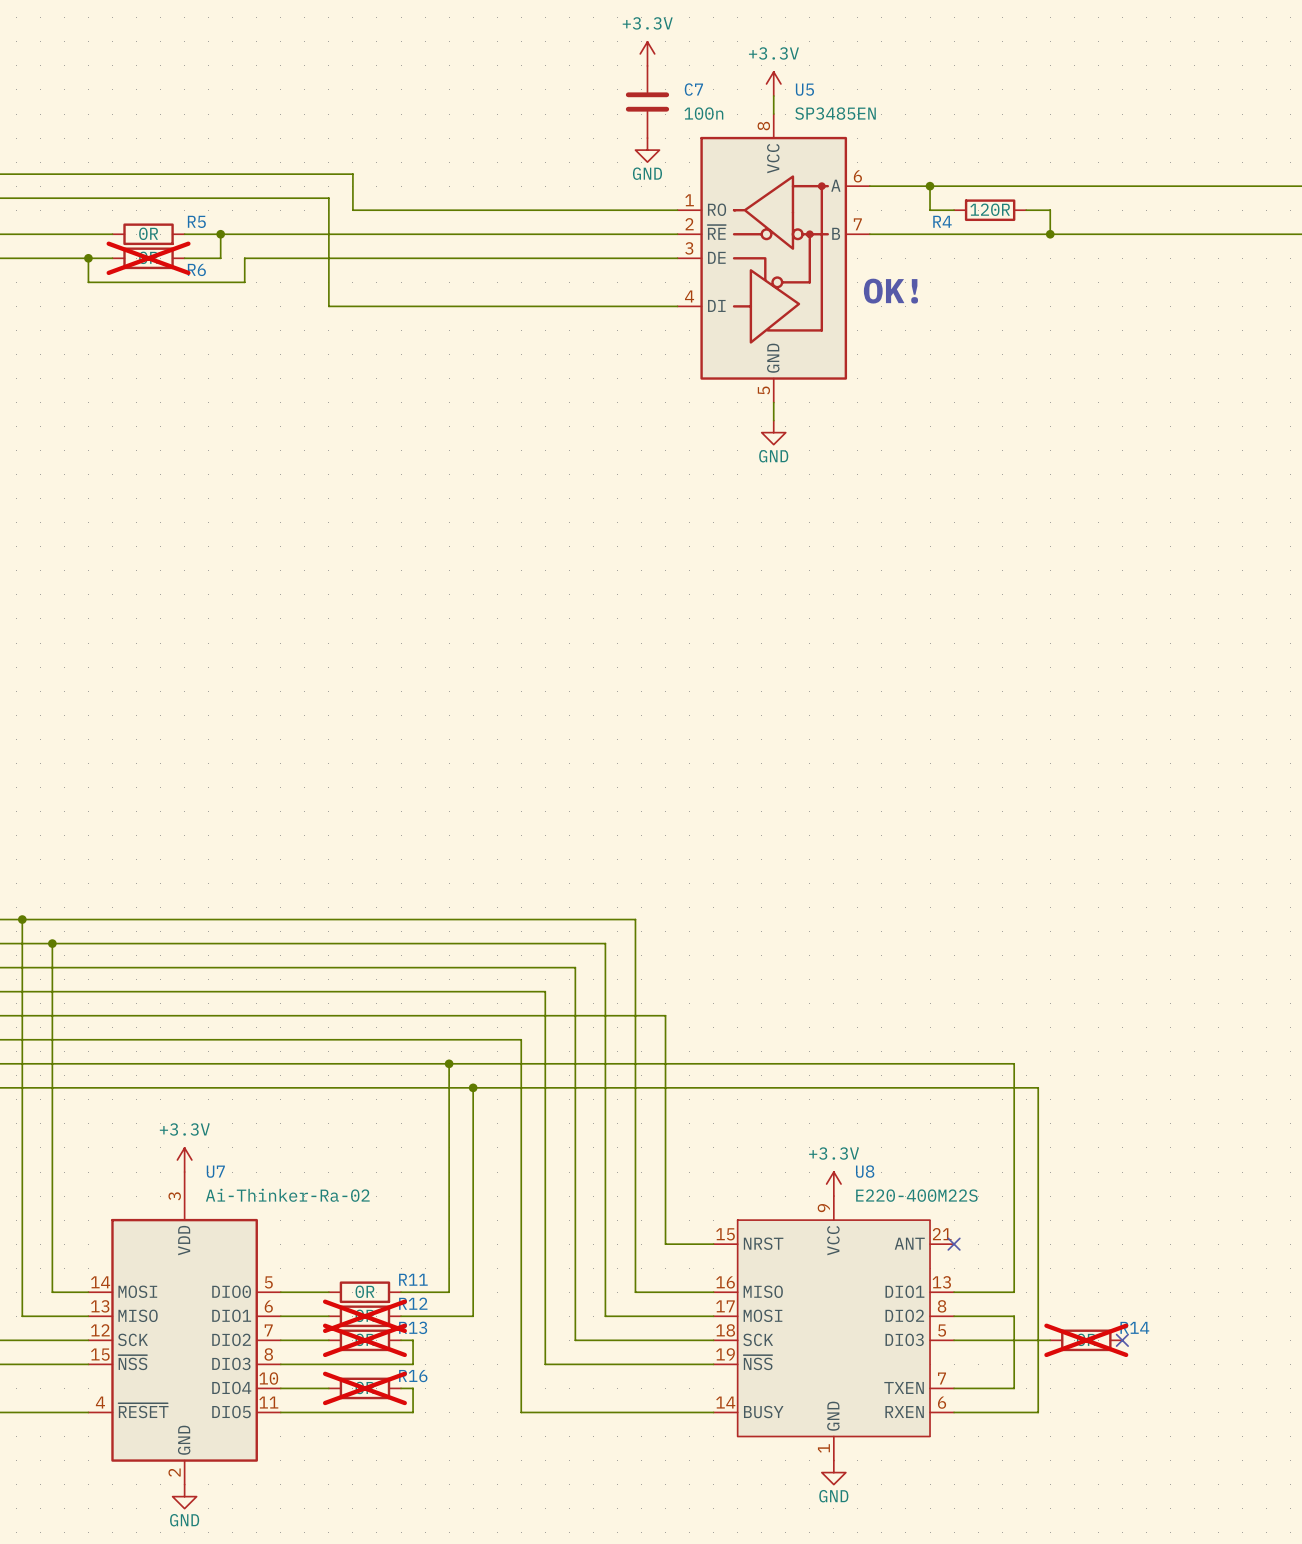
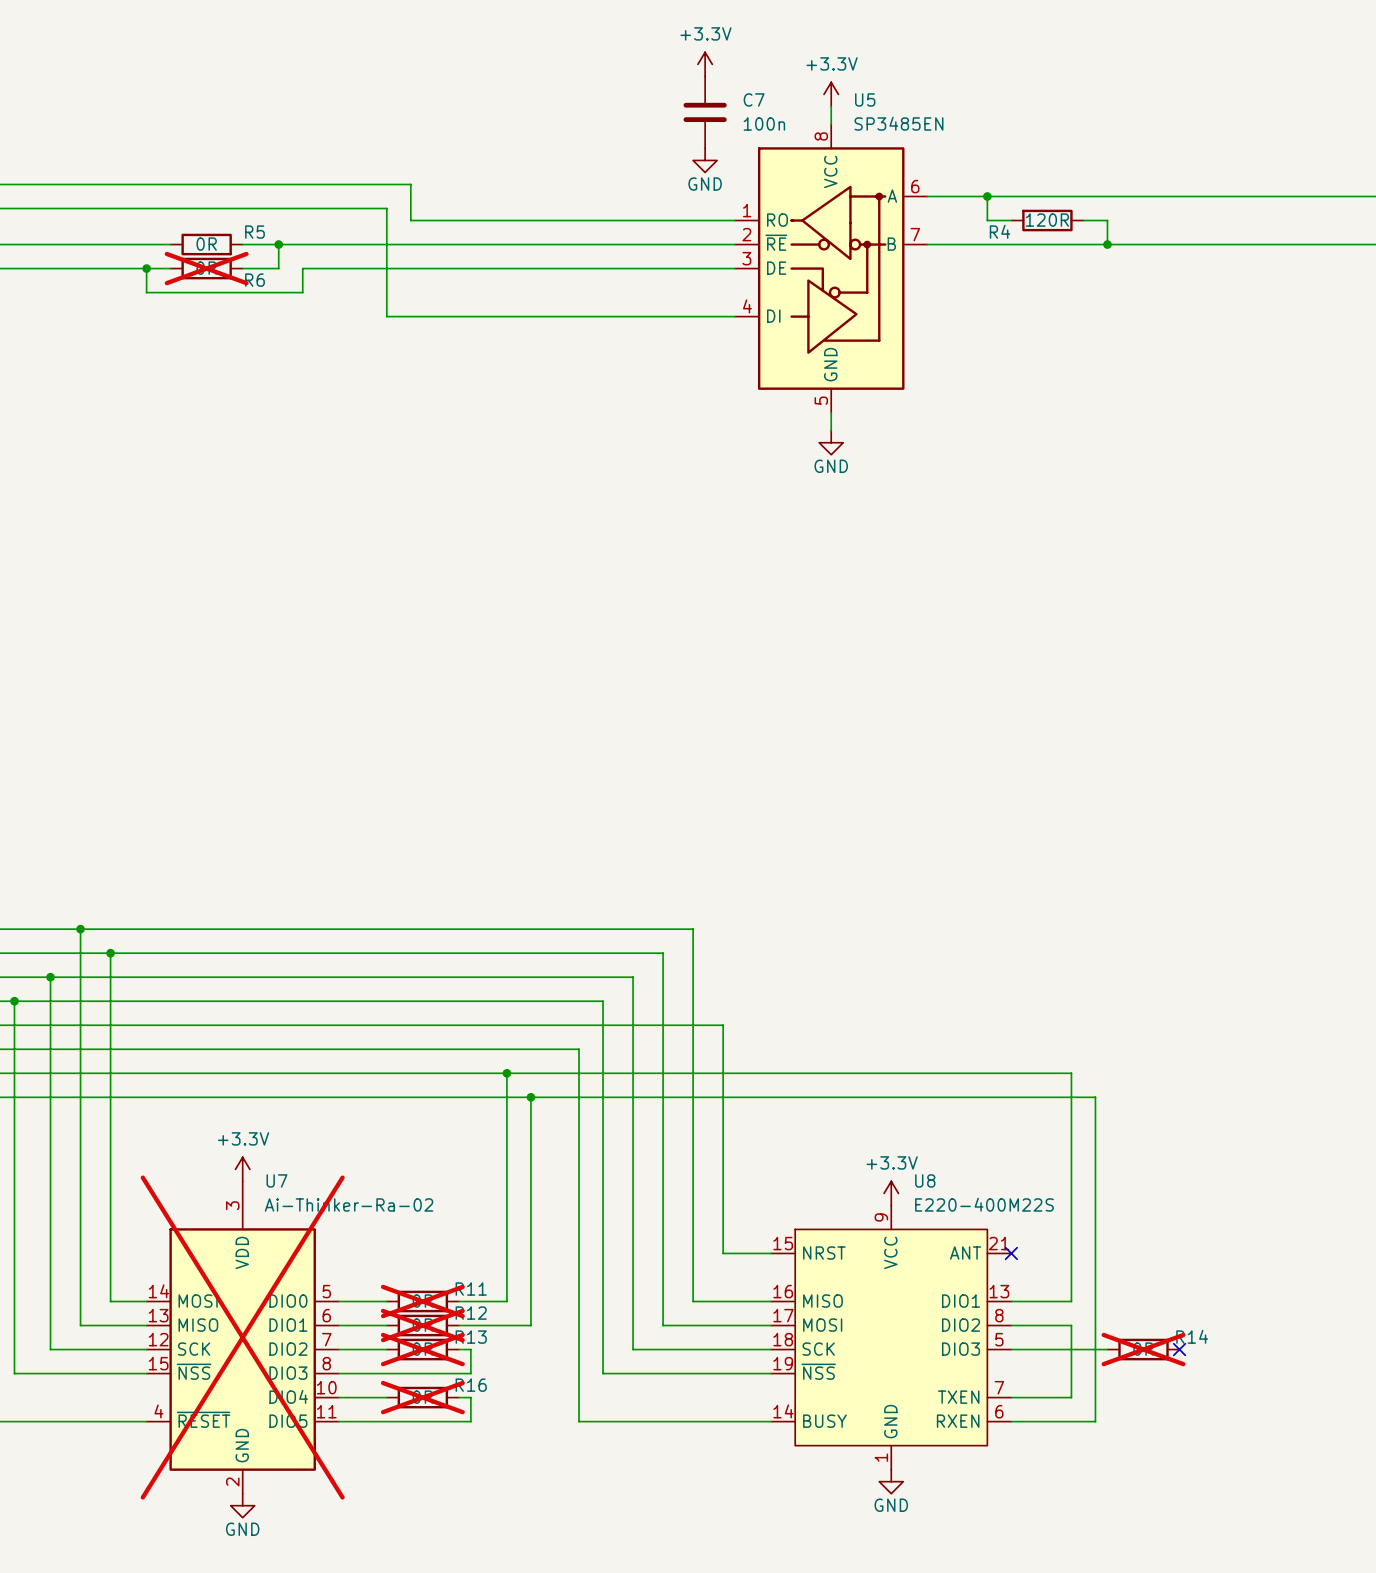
text: OK! (890, 291) -> none
R11 do-not-place cross: none -> (422, 1301)
U7 do-not-place cross: none -> (242, 1337)

